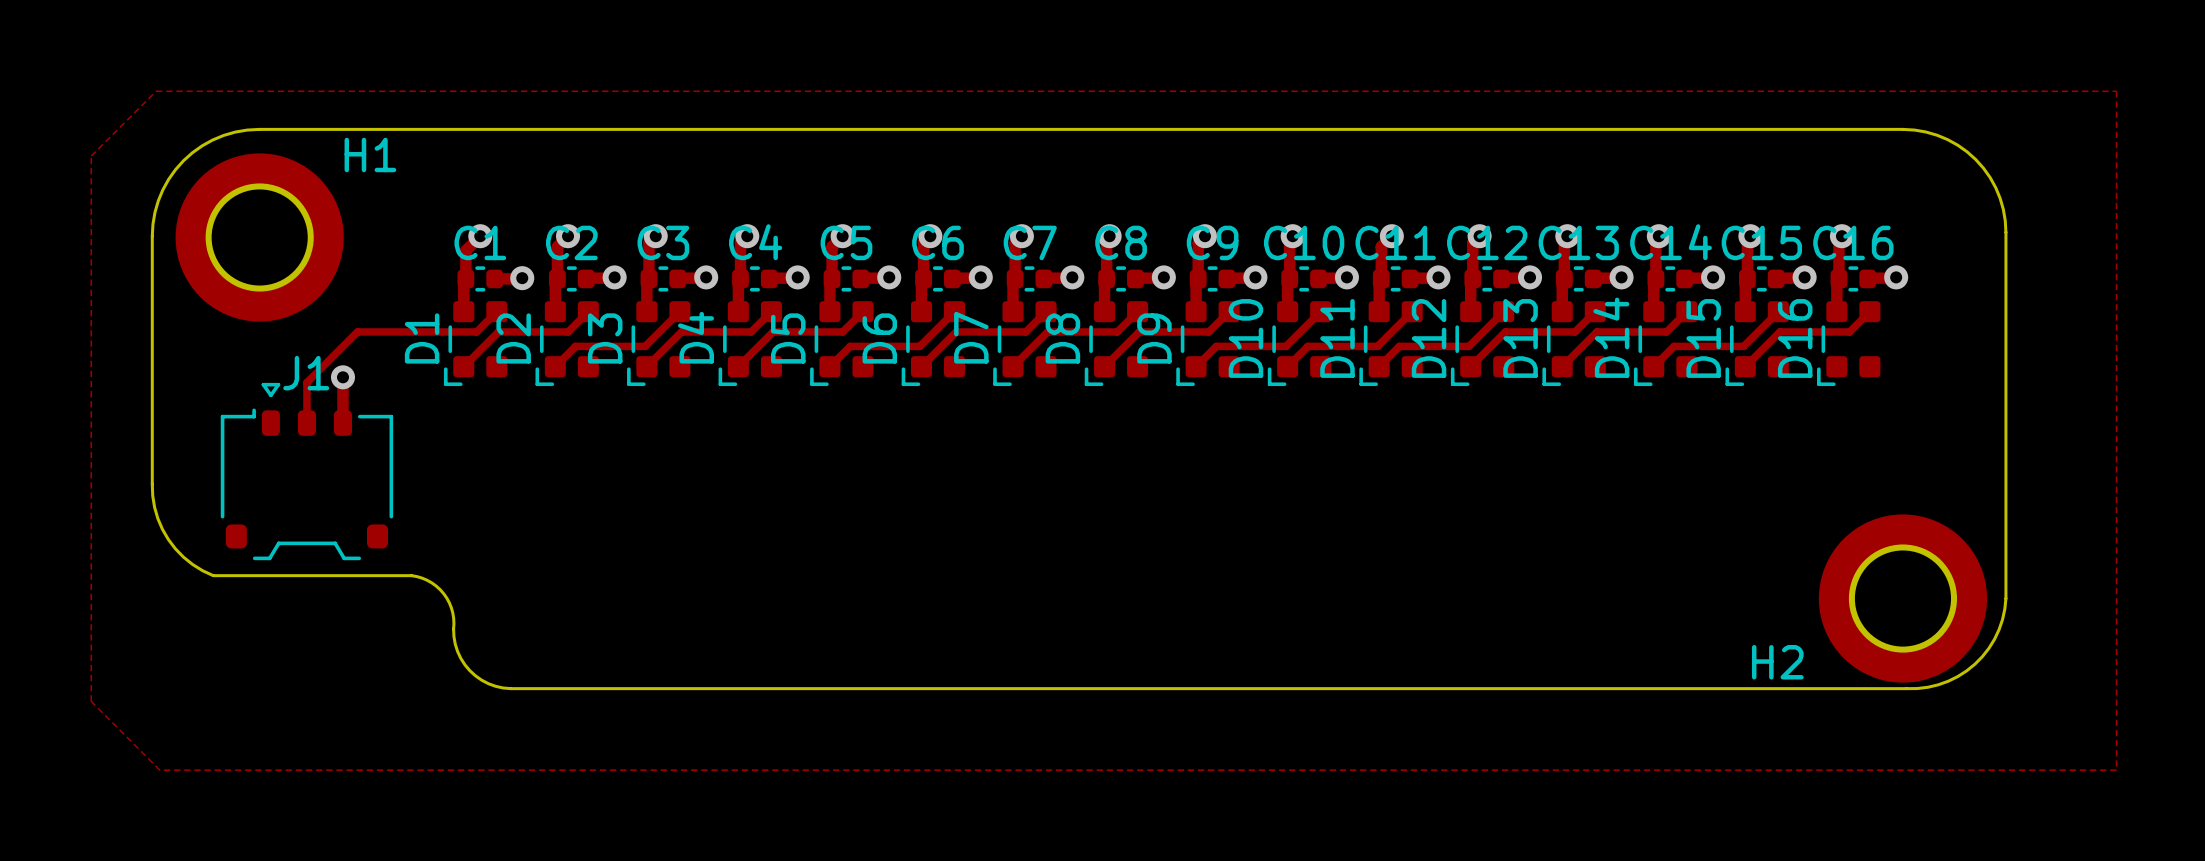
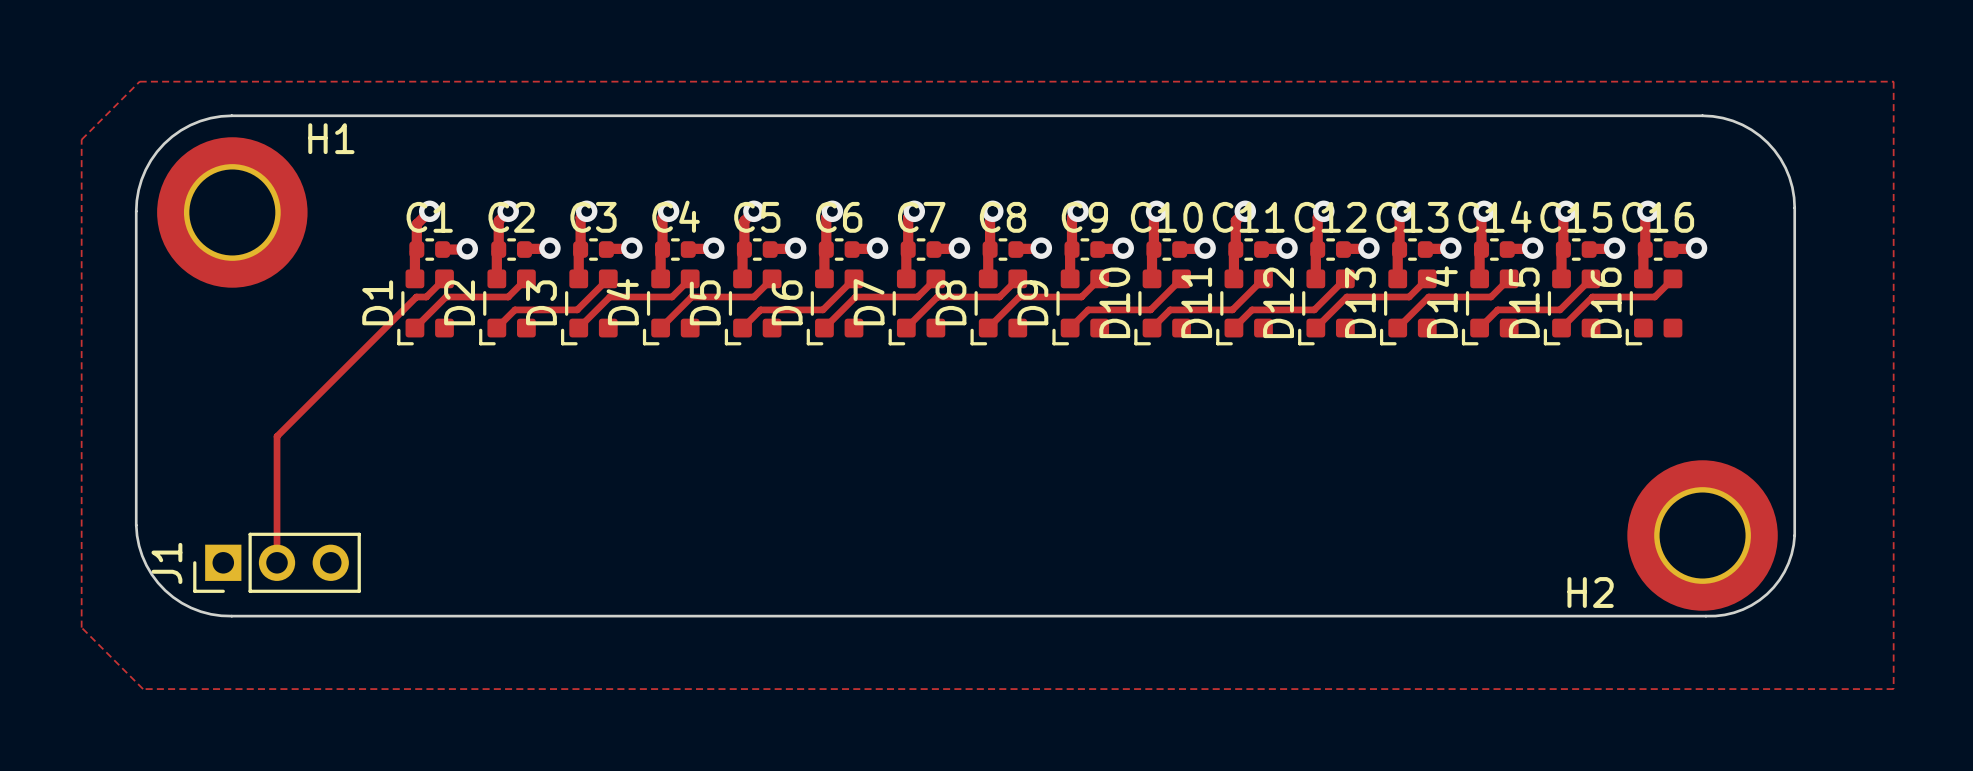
track: (465, 331) (357, 331) (306, 382) (306, 423) -> (416, 297) (277, 436) (277, 562)
J1 name position: J1 (306, 373) -> J1 (166, 563)
track: (342, 377) (342, 423) -> none
via: (342, 377) -> none
J1 footprint: [220, 382, 394, 561] -> [193, 532, 361, 593]
board edge: (152, 484) (154, 507) (168, 539) (192, 564) (213, 575) (411, 575) (431, 582) (443, 593) (451, 607) (455, 644) (464, 664) (481, 680) (495, 686) (510, 688) -> (136, 433) (136, 525) (139, 545) (151, 574) (165, 590) (181, 603) (200, 611) (221, 615) (457, 616)

